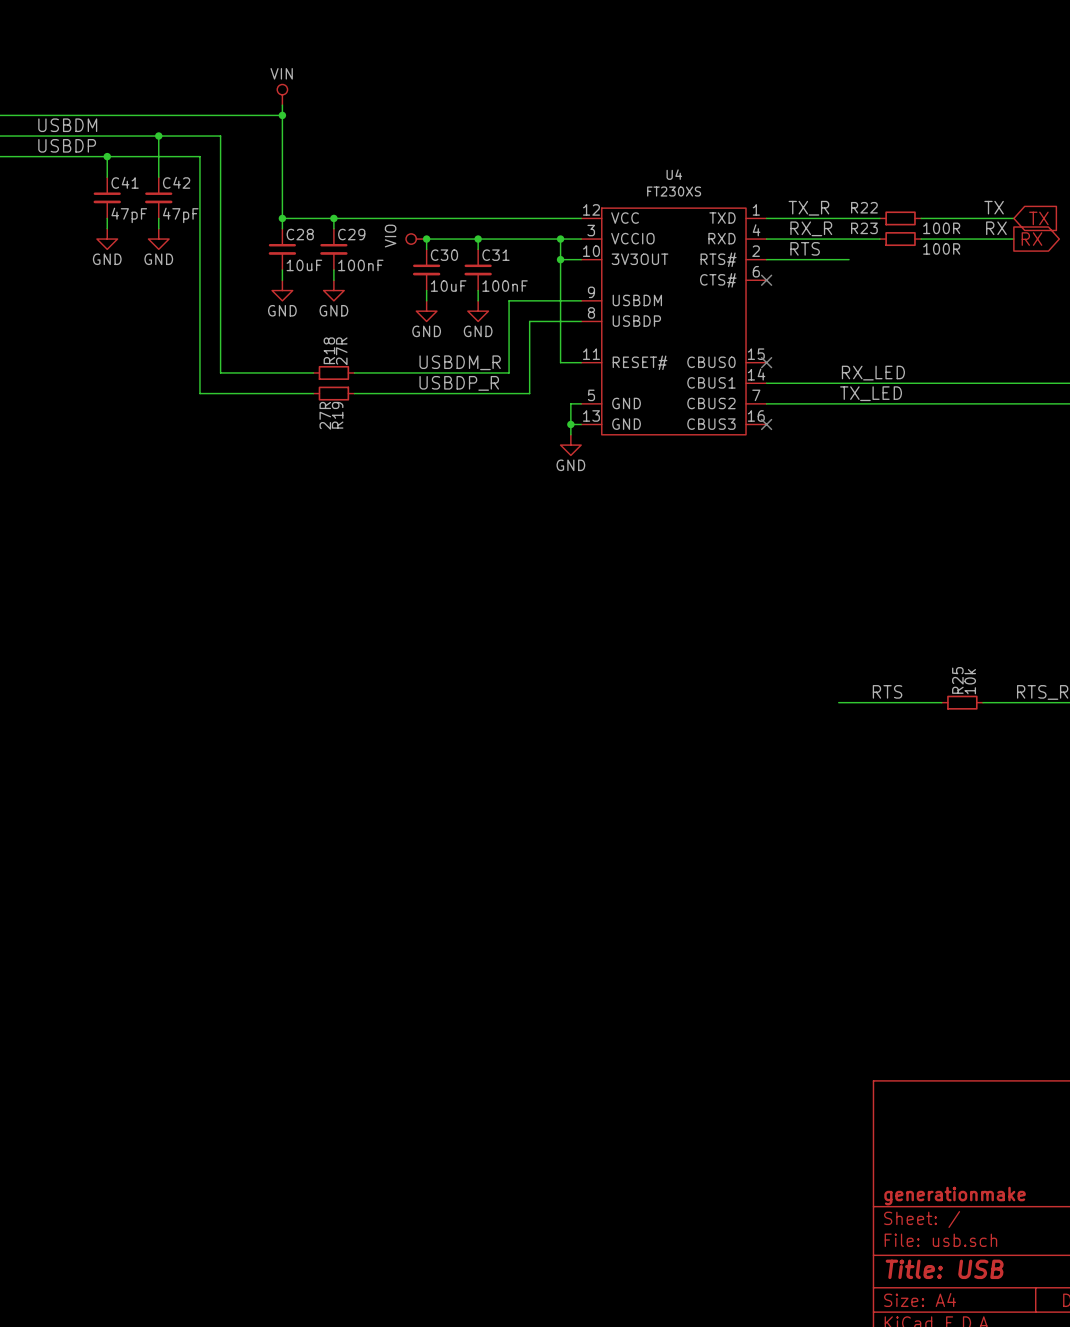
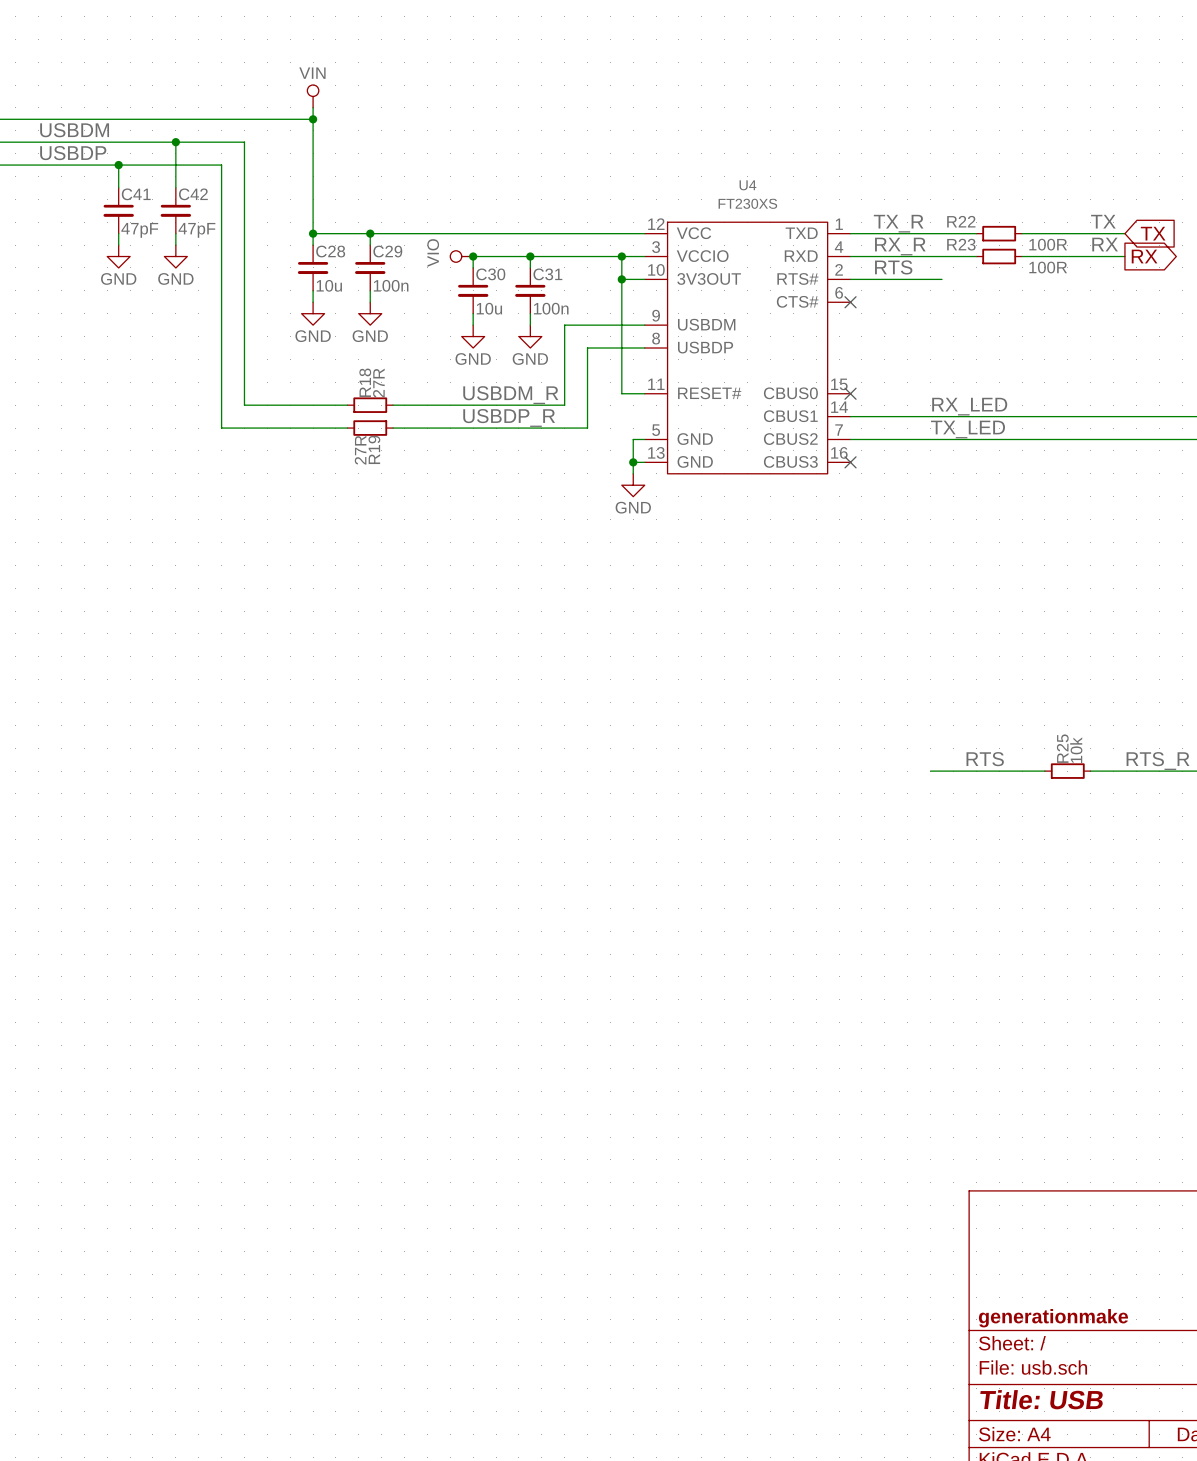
C28 value: 10uF (304, 265) -> 10u (329, 285)
C29 value: 100nF (360, 265) -> 100n (391, 285)
C30 value: 10uF (448, 286) -> 10u (489, 308)
C31 value: 100nF (505, 286) -> 100n (551, 308)

